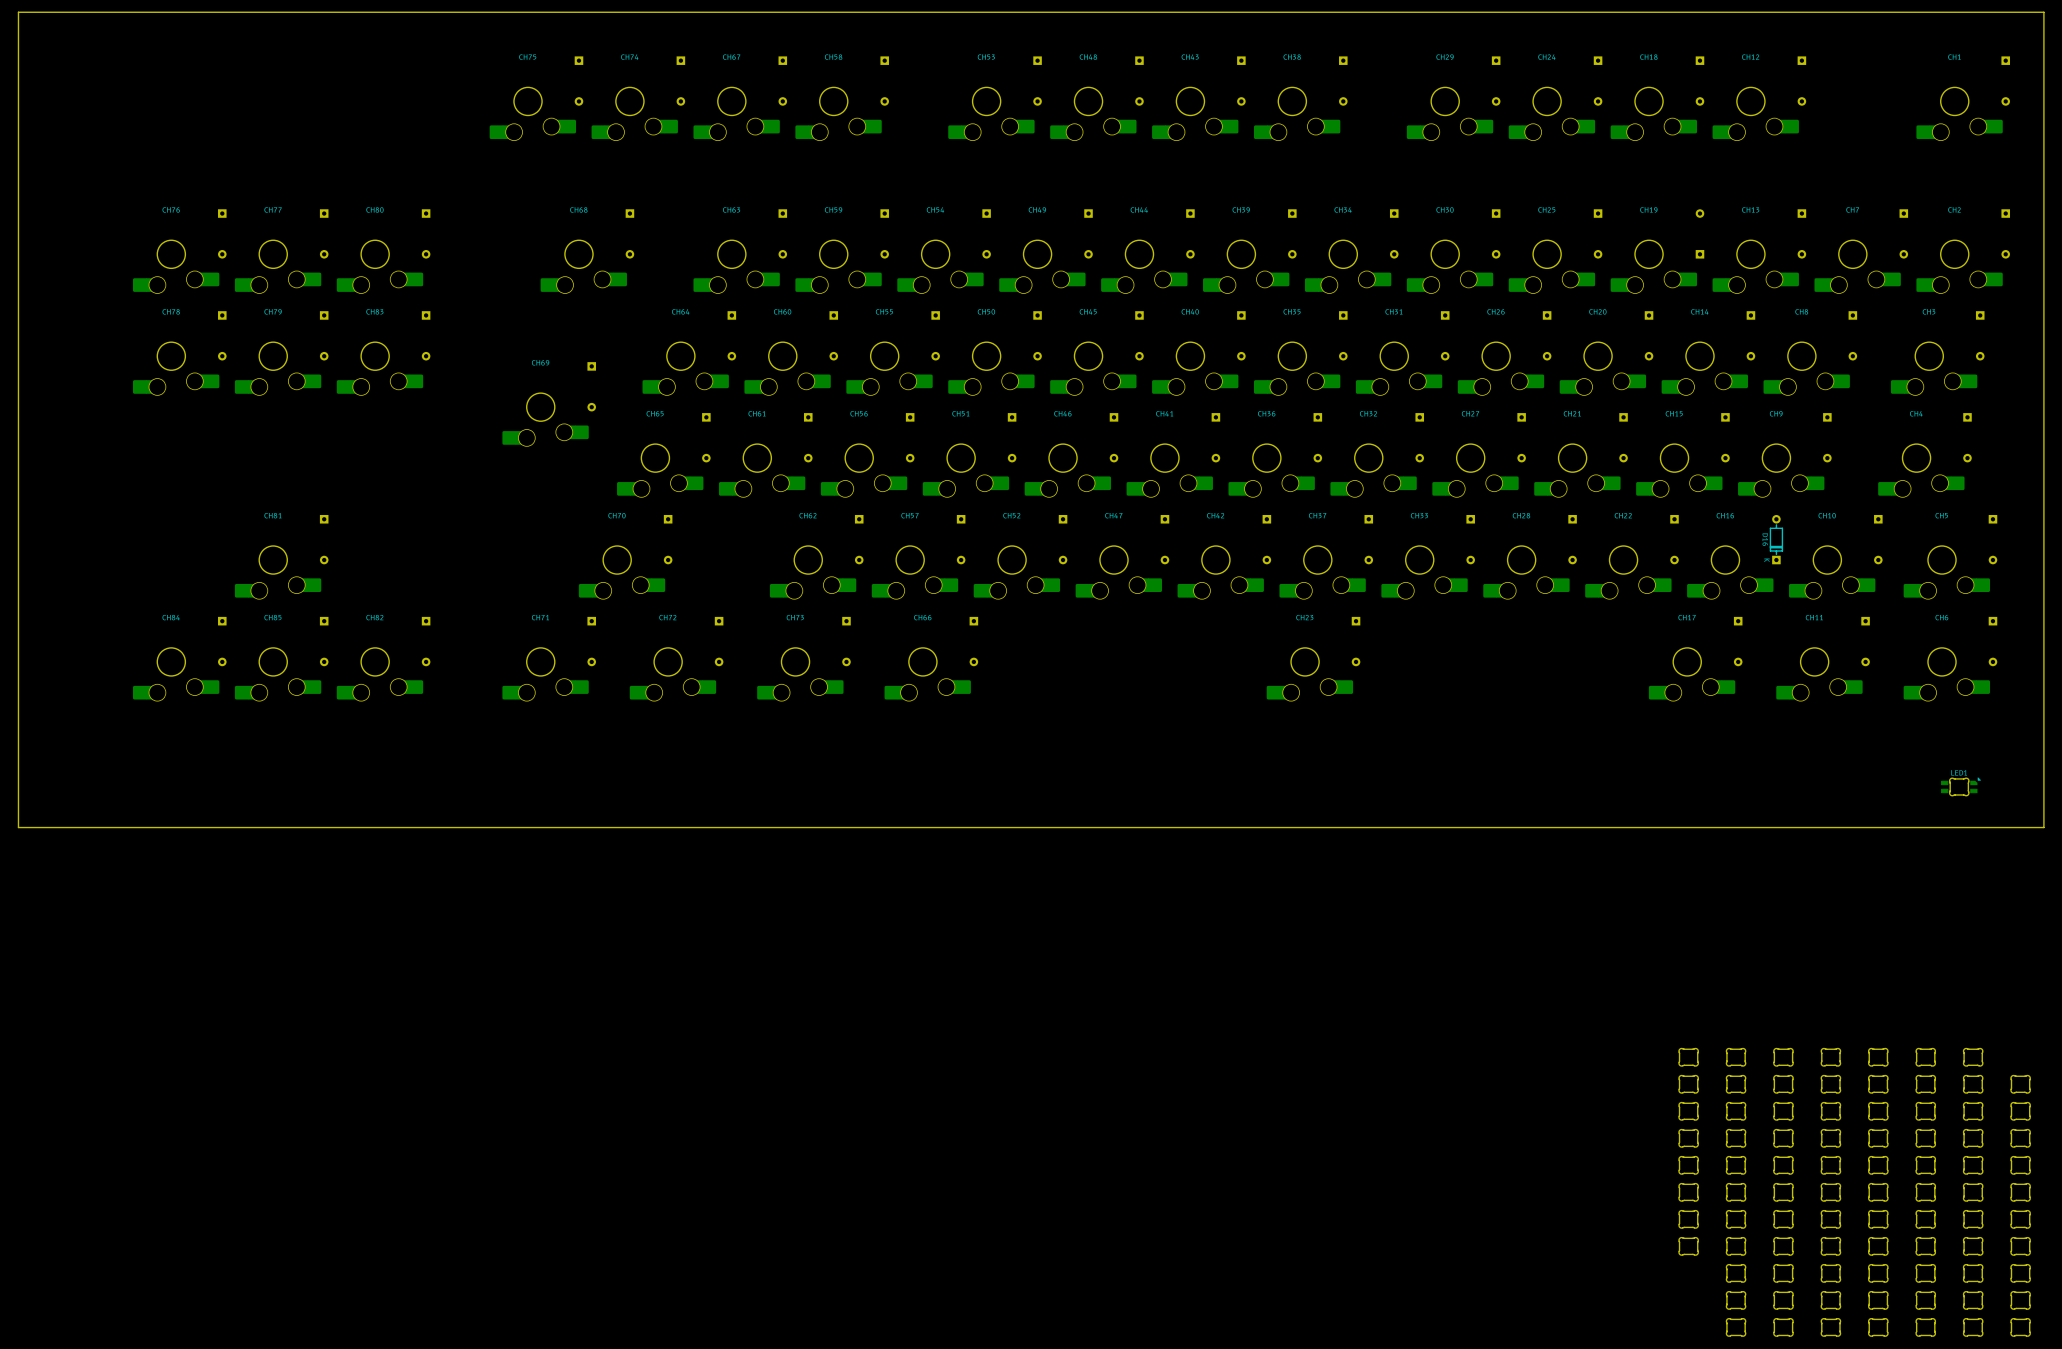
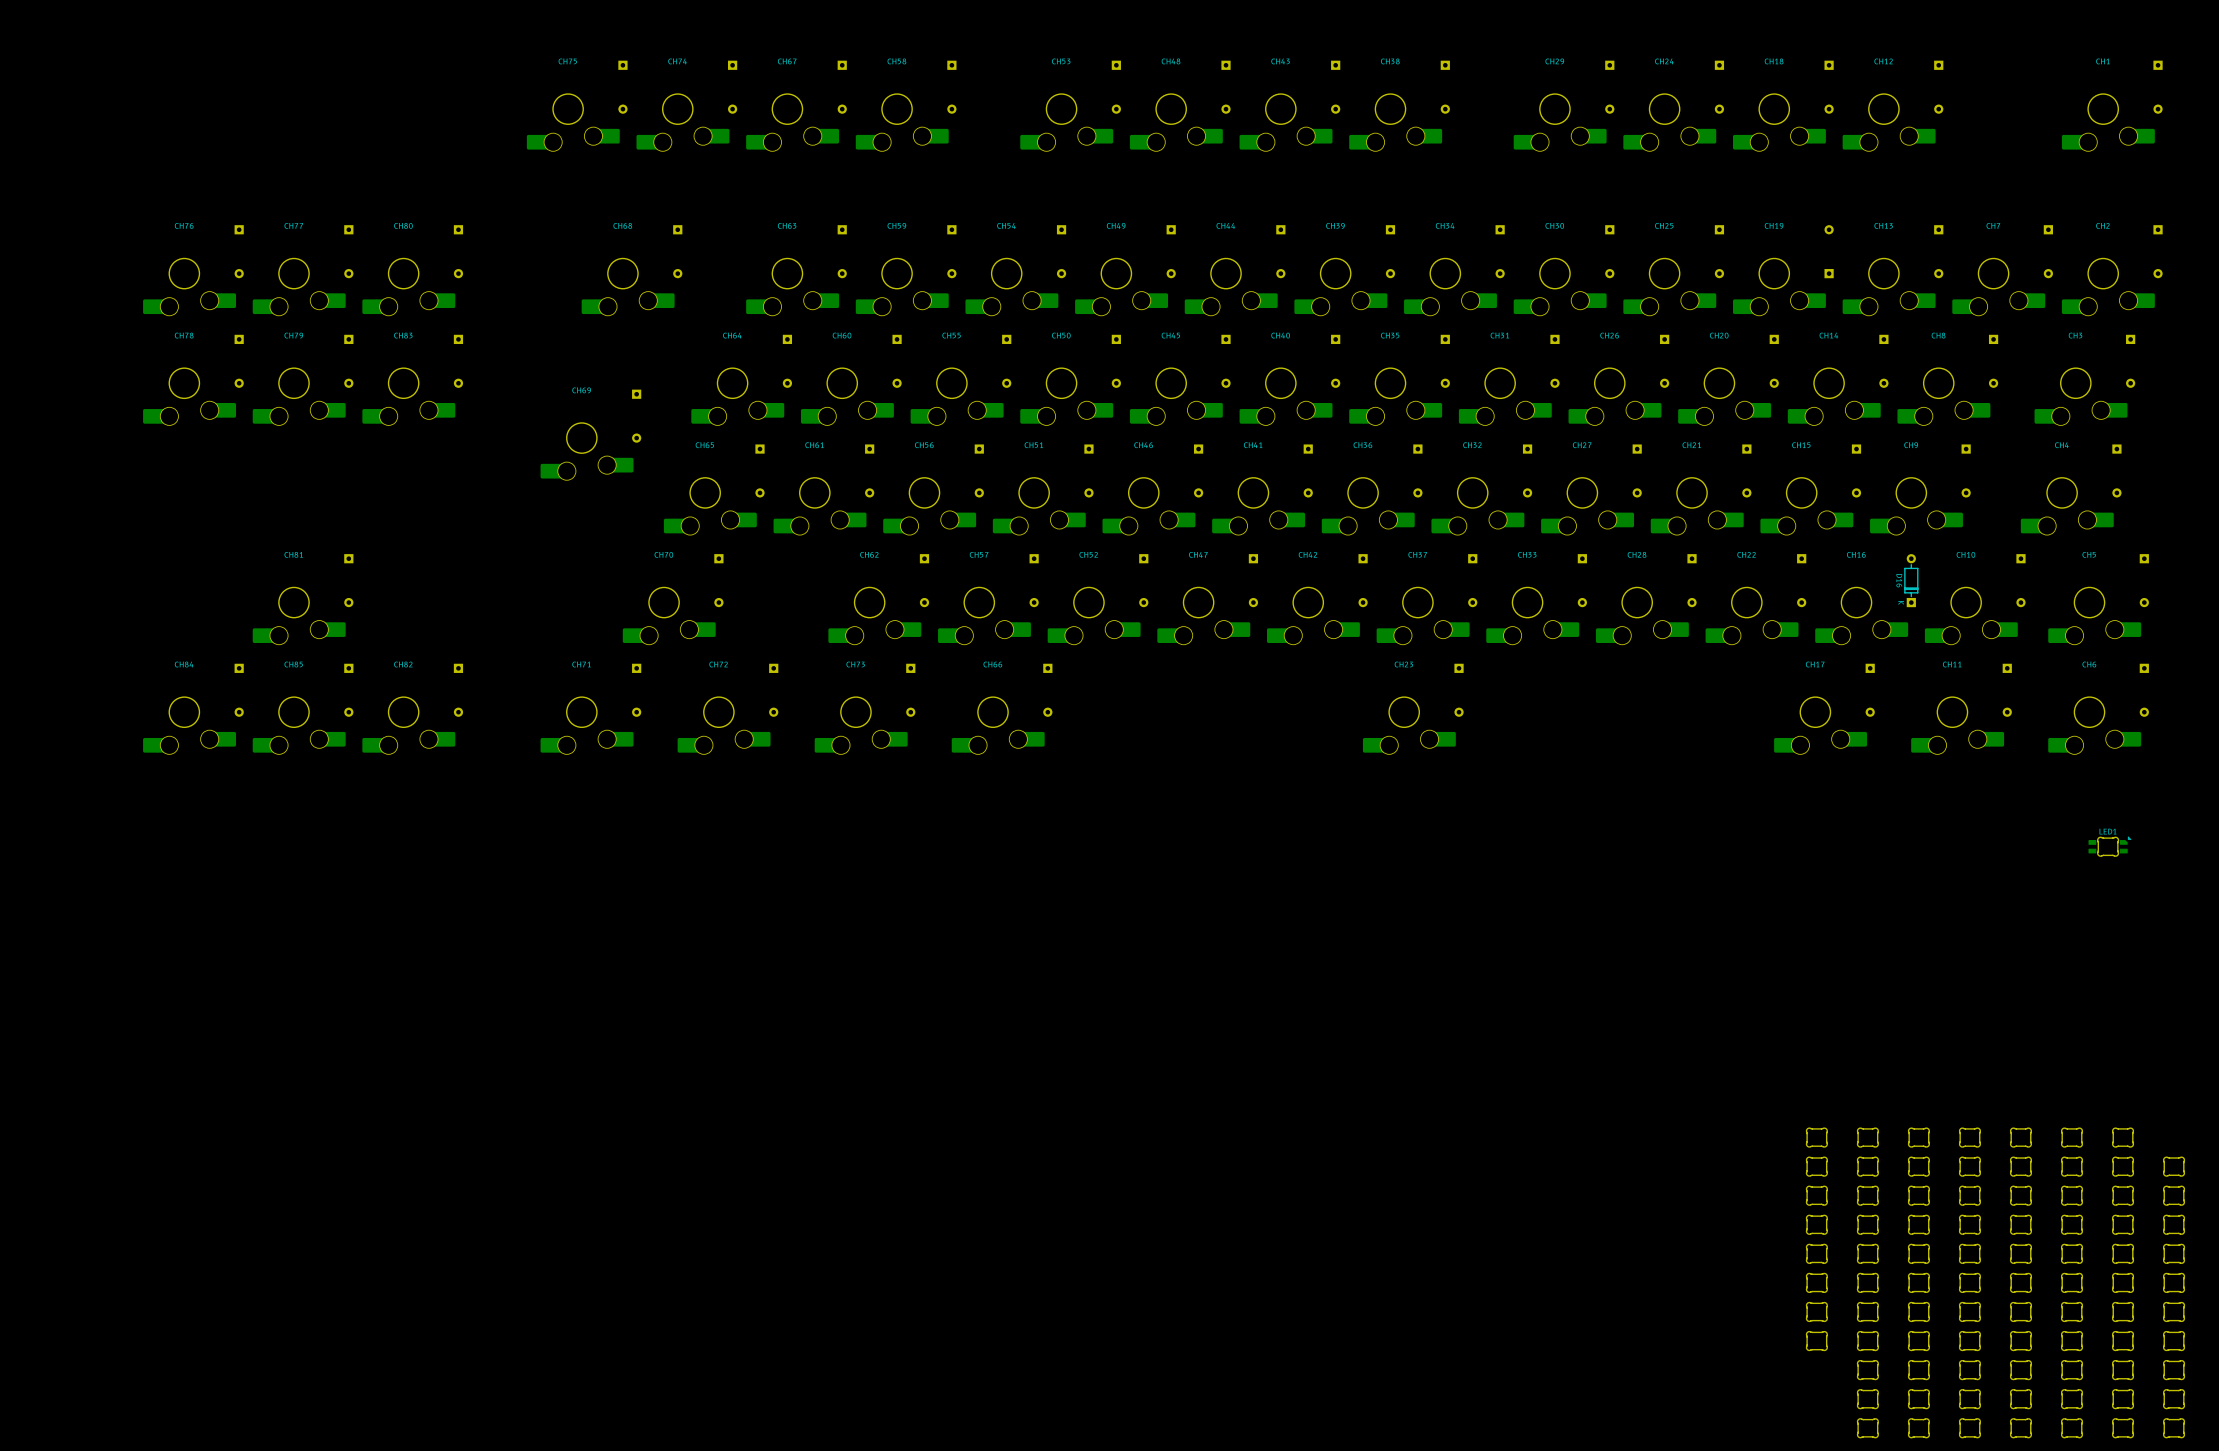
board edge: (2043, 12) (18, 12) (18, 827) (2043, 827) (2043, 12) -> none

